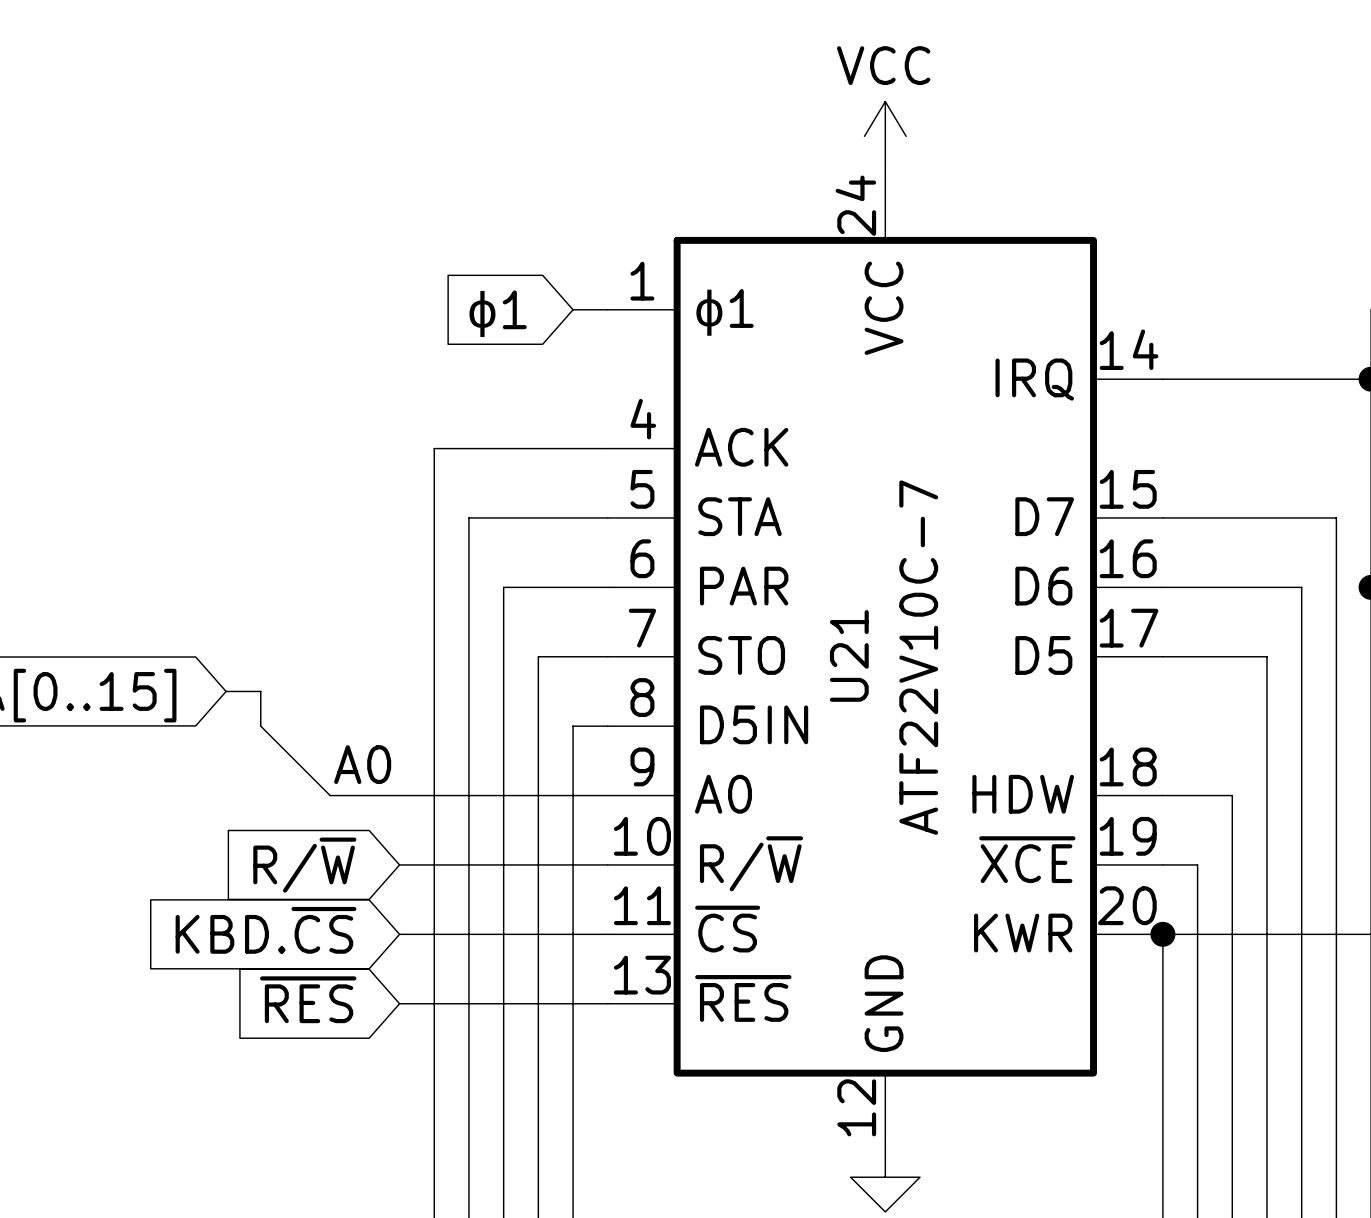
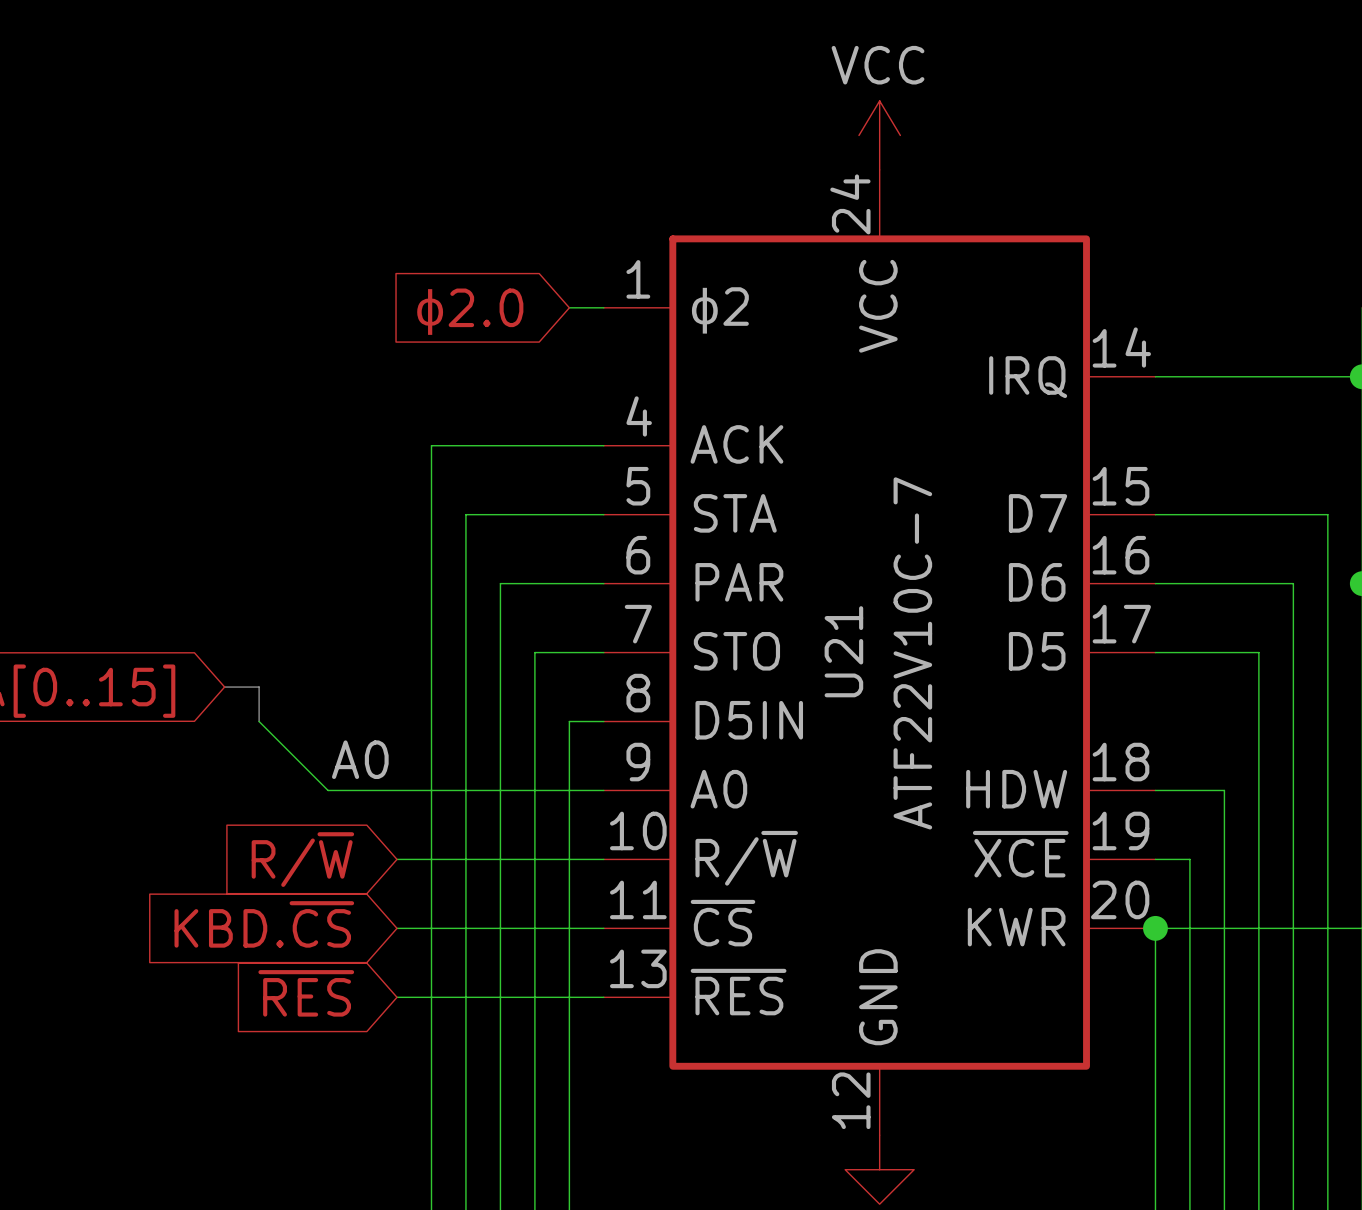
U21 pin name: ϕ1 (723, 312) -> ϕ2 (719, 310)
global label: ϕ1 (497, 314) -> ϕ2.0 (469, 312)

